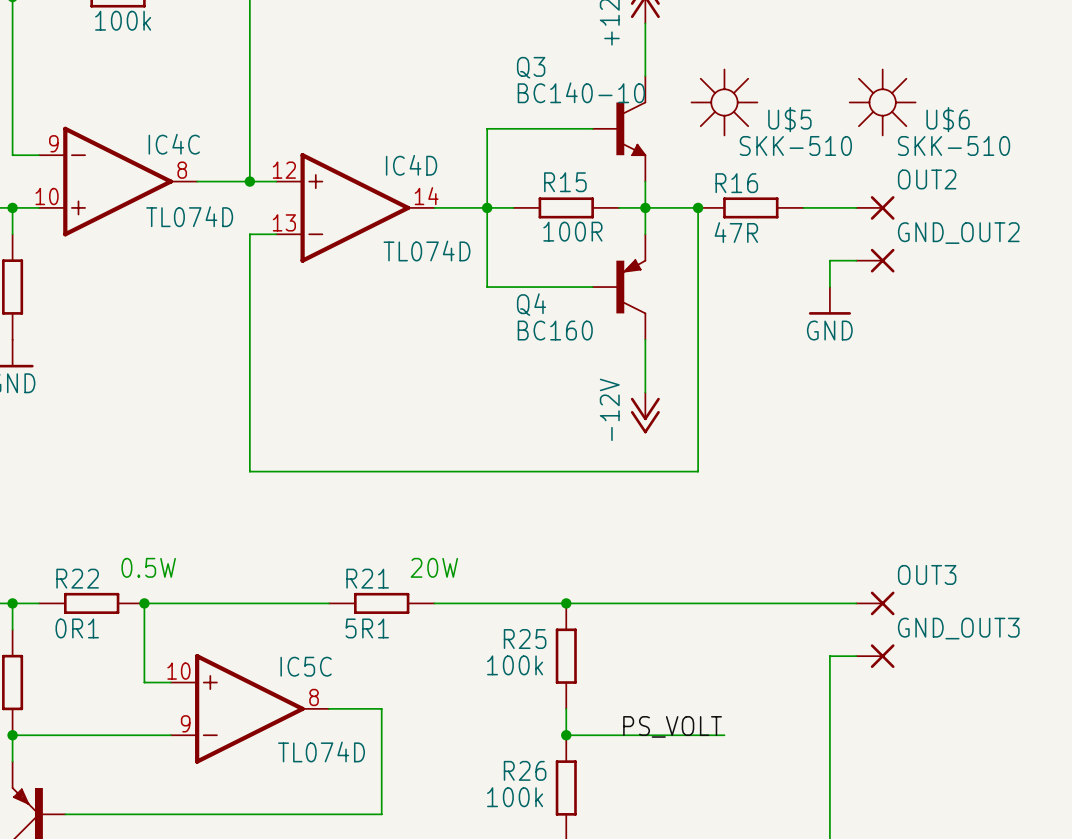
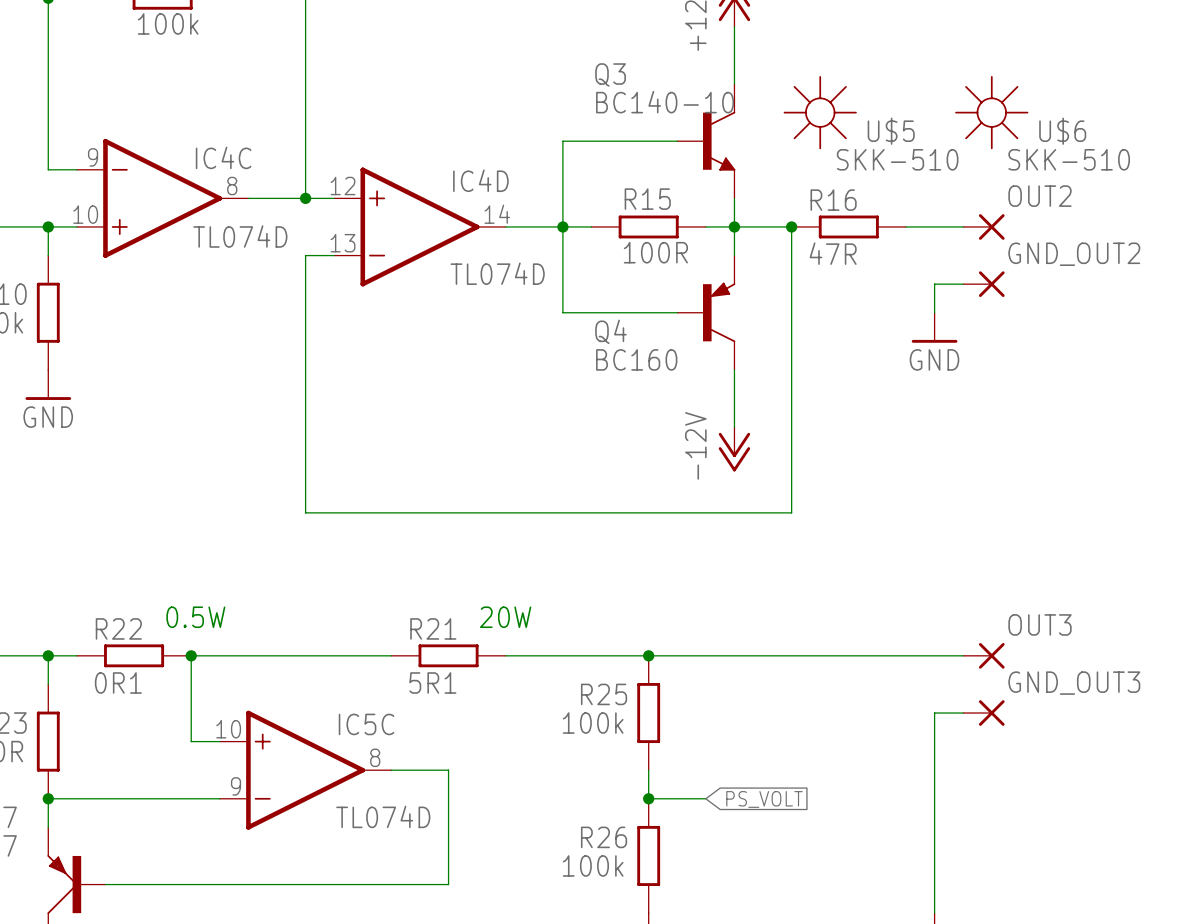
label: PS_VOLT (672, 726) -> none
wire: (619, 735) (724, 735) -> none
global label: none -> PS_VOLT (764, 799)

